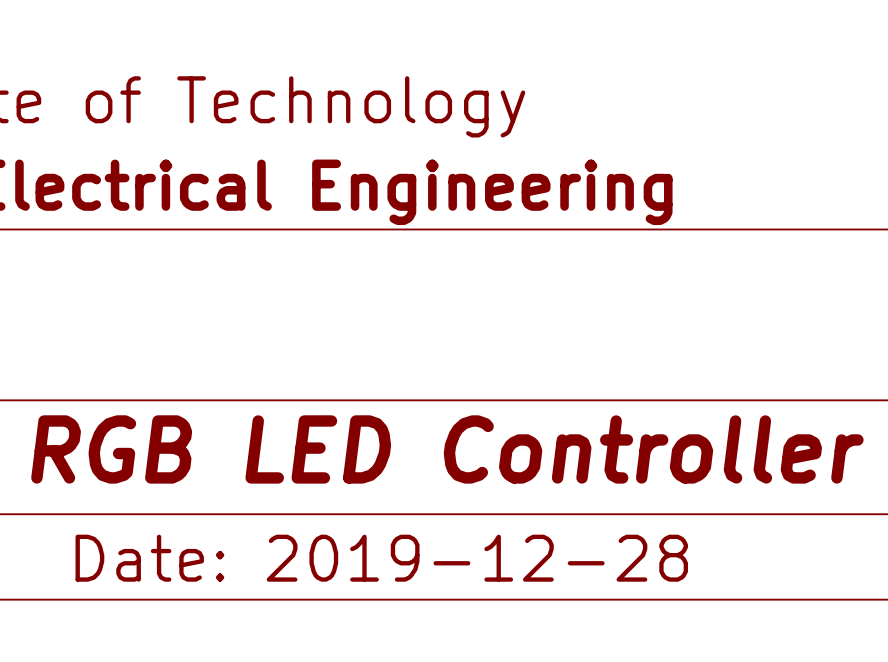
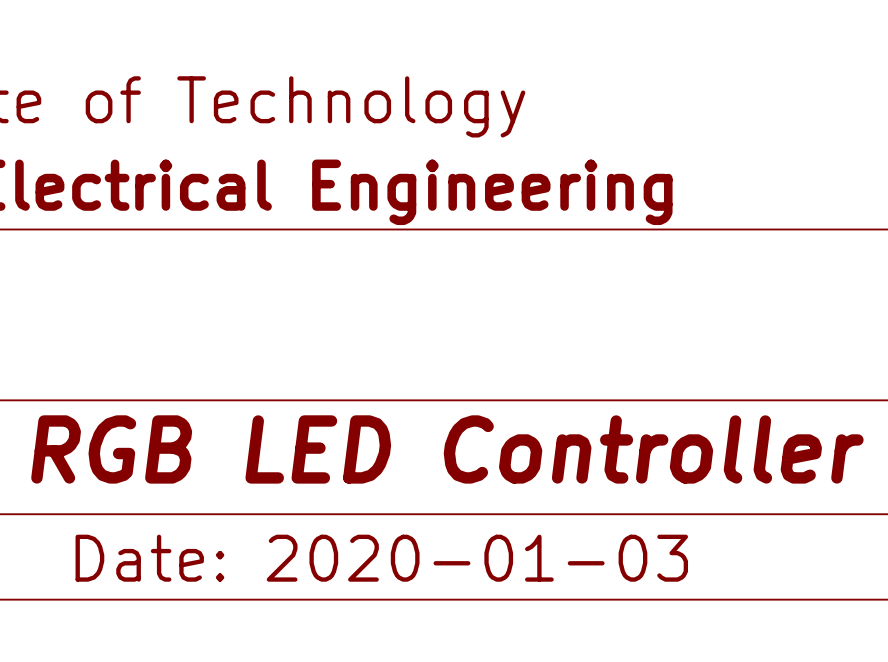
title block: Date: 2019-12-28 (381, 558) -> Date: 2020-01-03 (381, 558)

